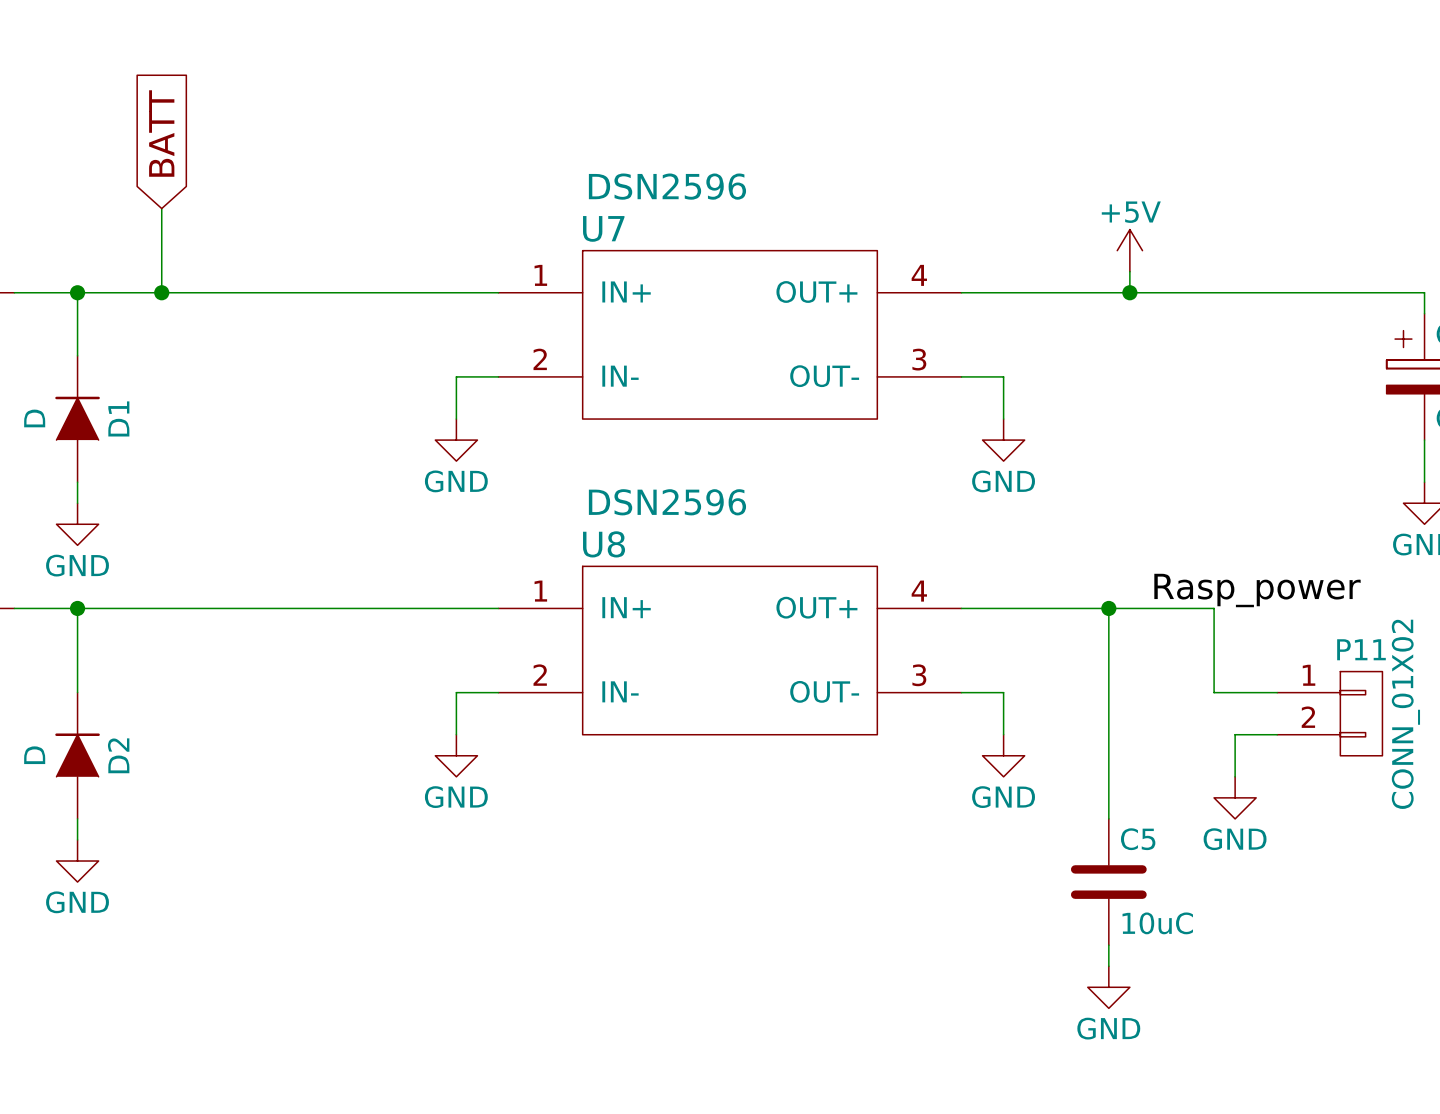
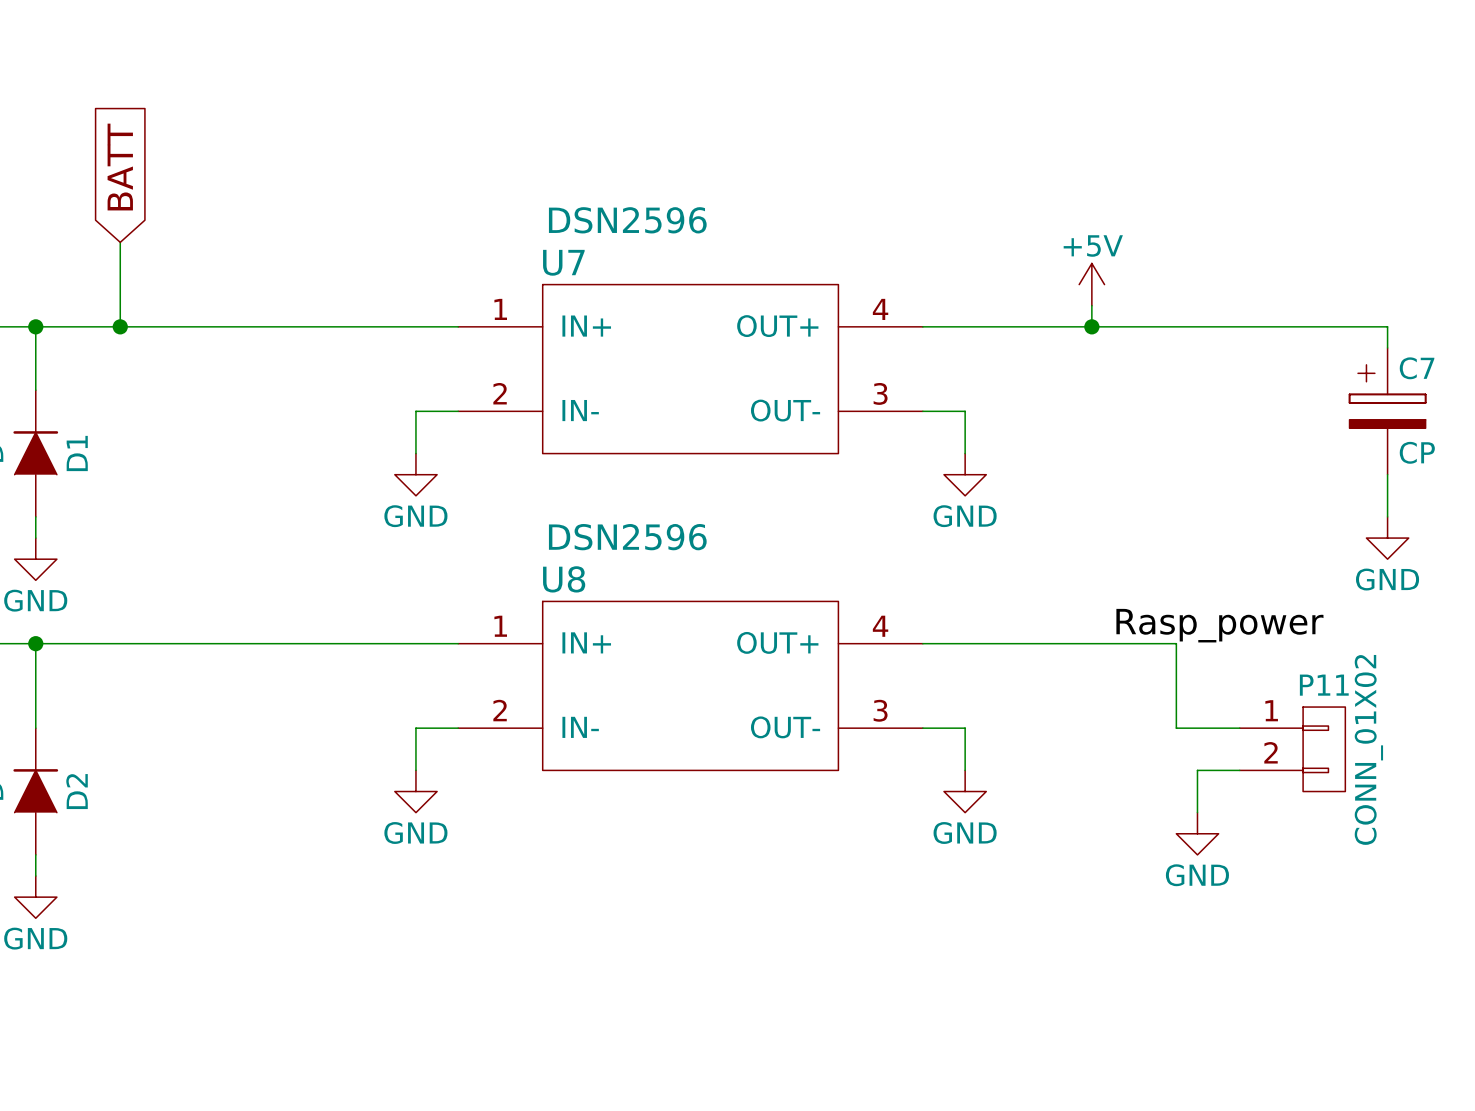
wire: (1108, 608) (1108, 818) -> none
junction: (1108, 608) -> none
C5: 10uC (1108, 882) -> none
wire: (1108, 945) (1108, 966) -> none
power symbol: GND (1108, 987) -> none

